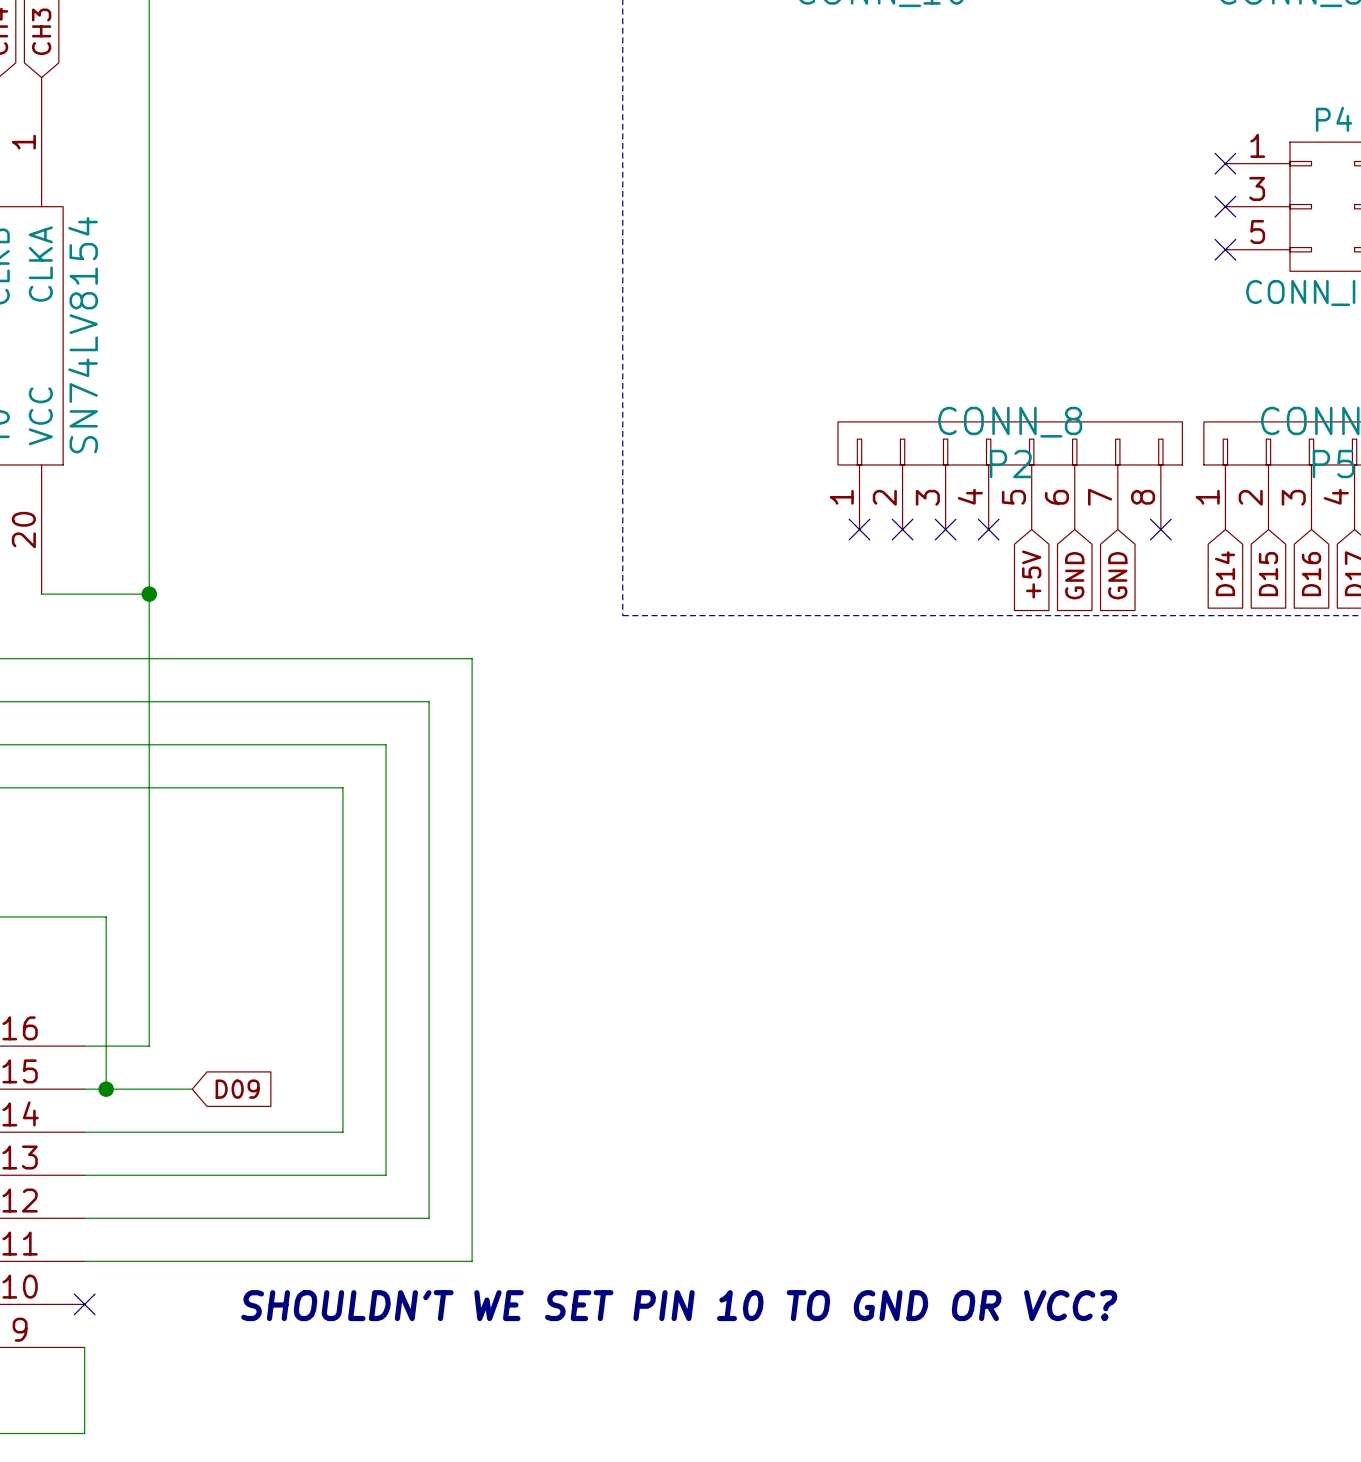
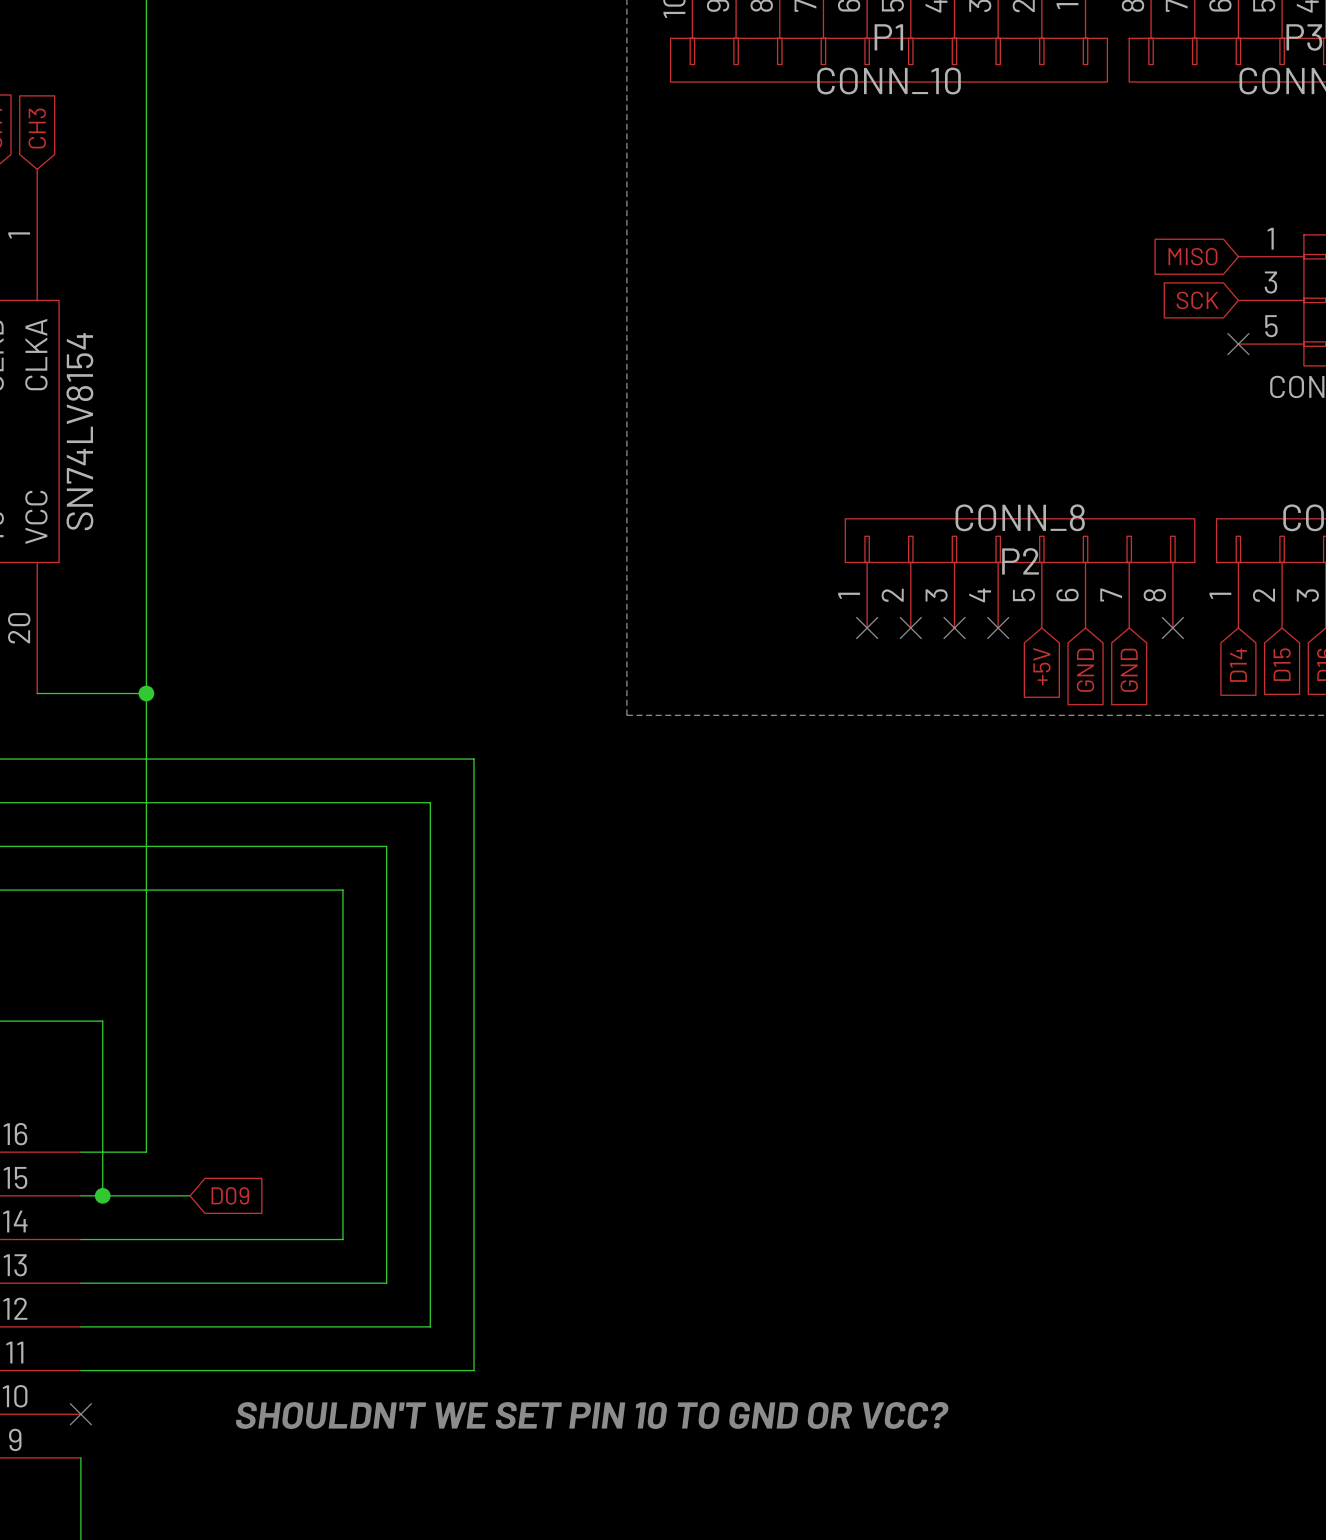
global label: none -> MISO (1192, 256)
no-connect mark: (1225, 163) -> none
global label: none -> SCK (1197, 300)
no-connect mark: (1225, 206) -> none

